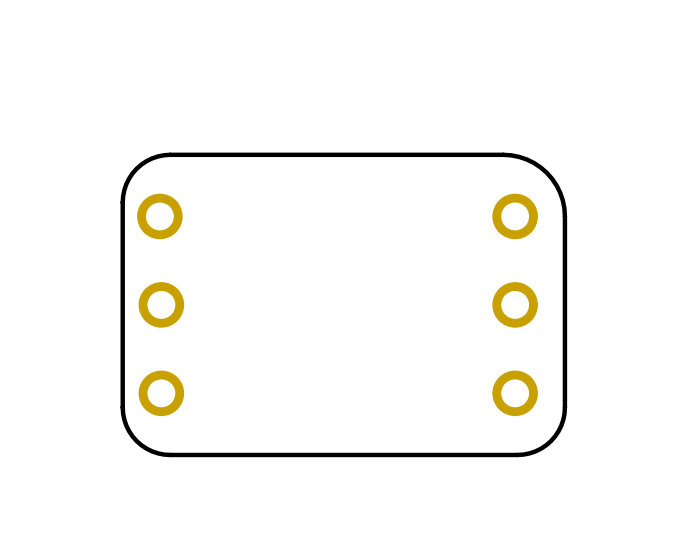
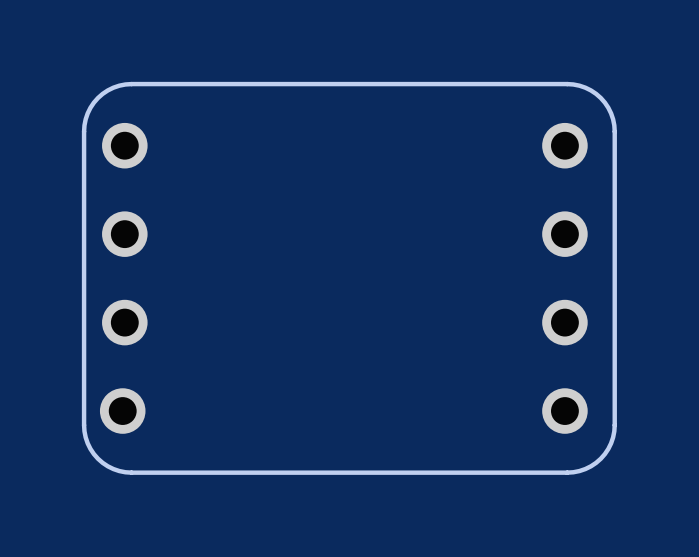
part footprint: [120, 152, 568, 458] -> [81, 81, 617, 475]

